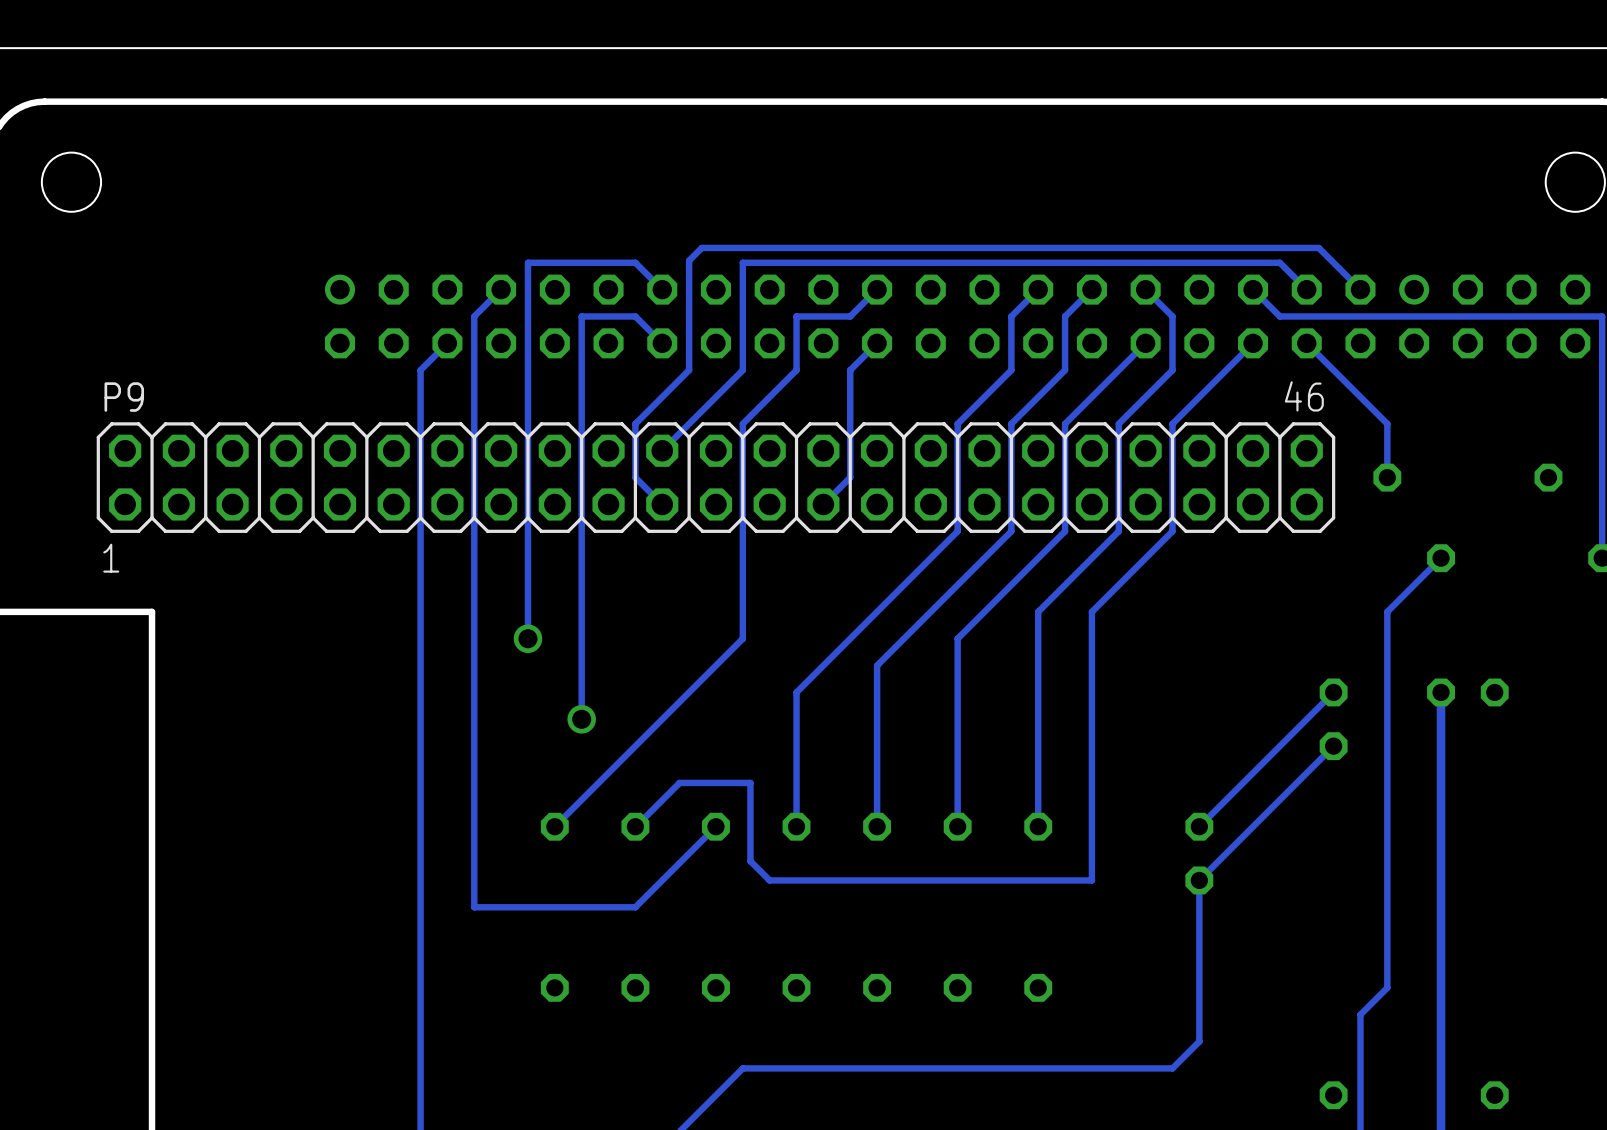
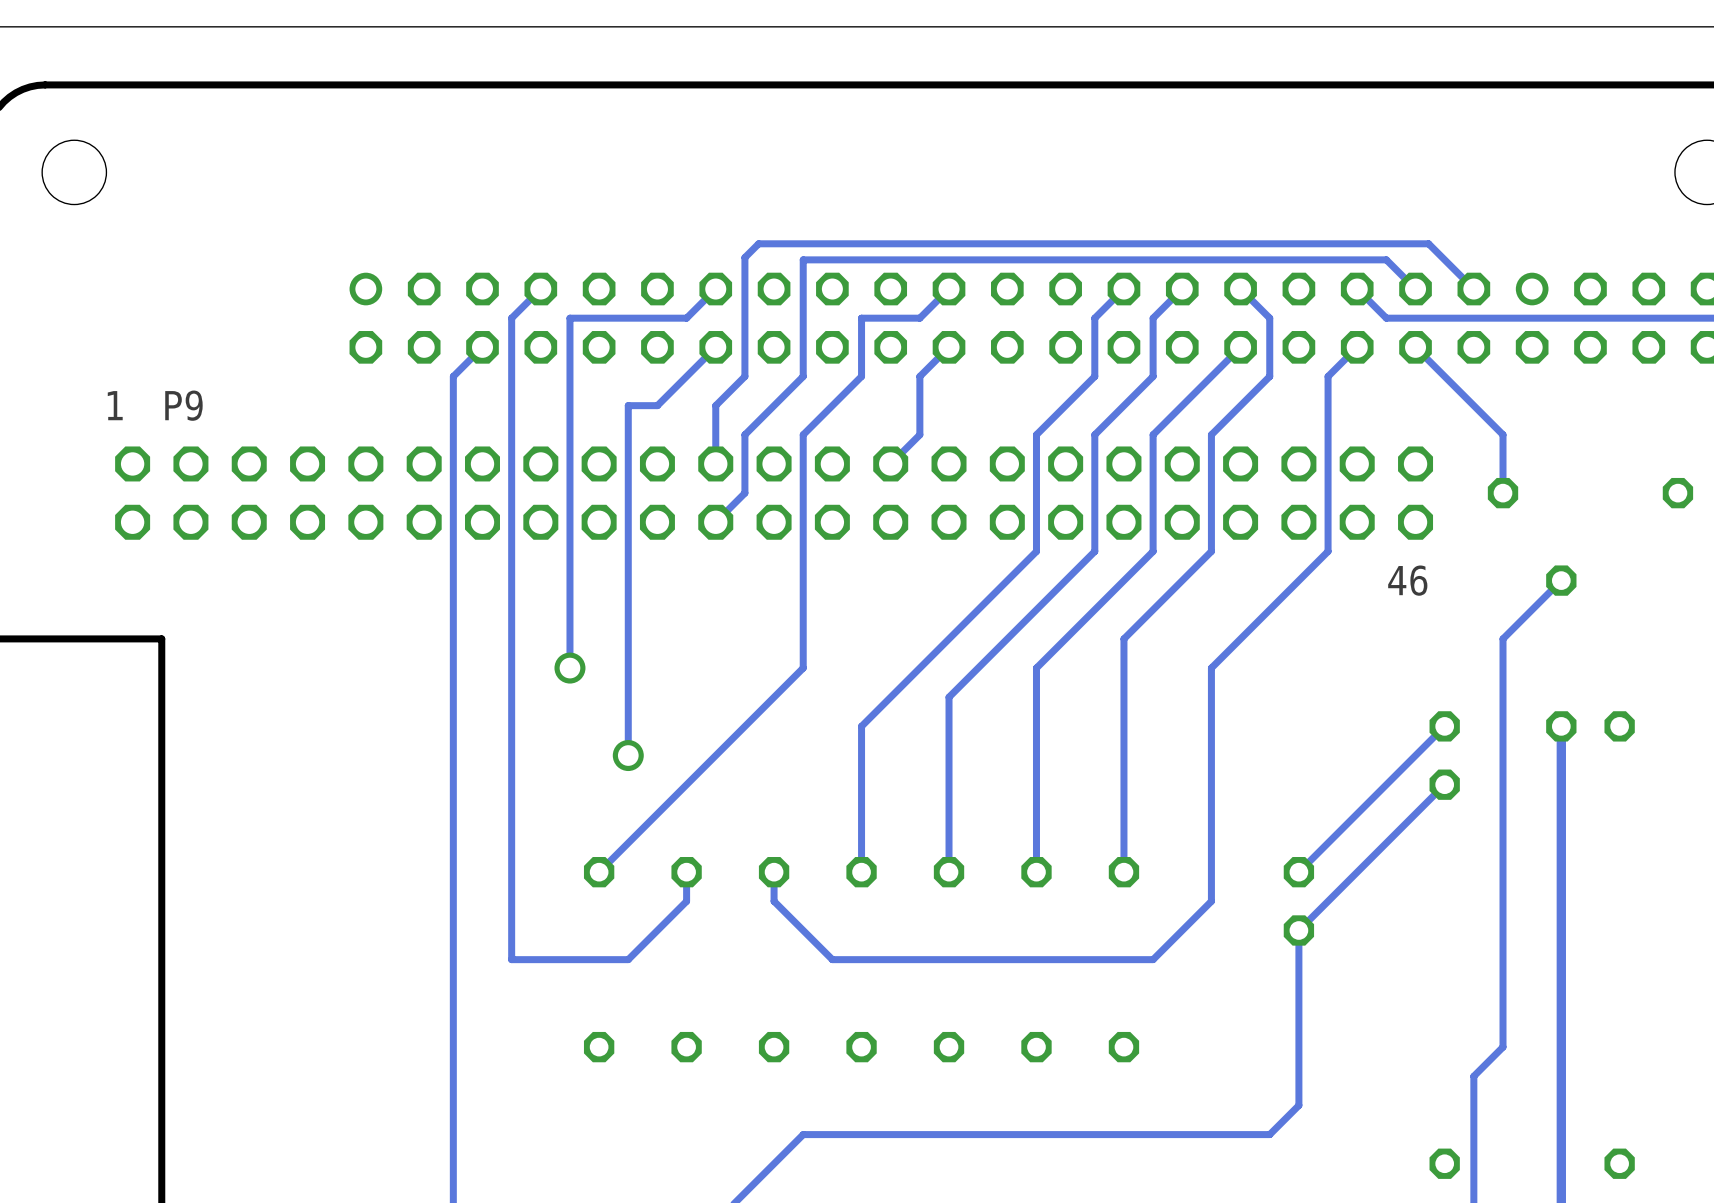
track: (662, 289) (635, 262) (527, 262) (527, 316) -> (628, 318) (569, 318)
track: (581, 316) (581, 397) -> (715, 347) (657, 405) (628, 405)
track: (635, 316) (662, 343) -> (686, 318) (715, 289)
track: (1226, 370) (1172, 423) (1172, 531) (1091, 611) (1091, 880) (769, 880) (750, 861) (750, 782) (679, 782) (635, 826) -> (1328, 376) (1328, 551) (1211, 668) (1211, 901) (1153, 959) (832, 959) (774, 901) (774, 872)
P9 name position: P9 (124, 397) -> P9 (183, 405)
track: (662, 397) (635, 423) (635, 477) (662, 504) -> (744, 434) (744, 493) (715, 522)
P9 footprint: [96, 422, 1336, 533] -> [115, 446, 1434, 540]
track: (689, 423) (662, 450) -> (715, 405) (715, 463)
track: (850, 423) (850, 477) (823, 504) -> (919, 434) (890, 463)
track: (715, 826) (635, 907) (581, 907) -> (686, 872) (686, 901) (628, 959)

